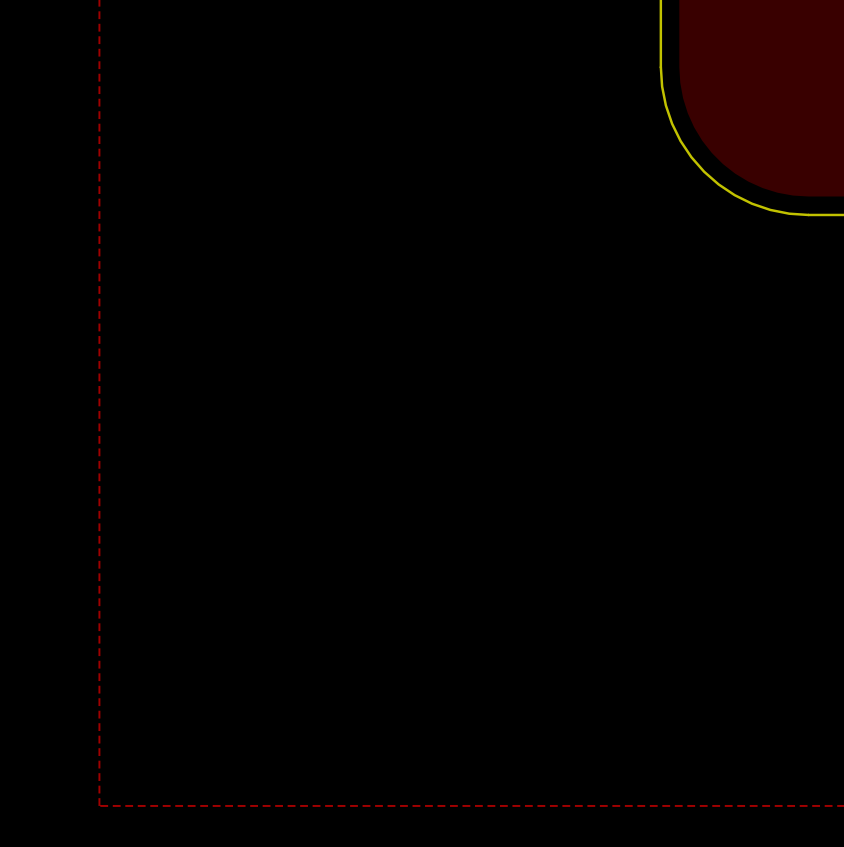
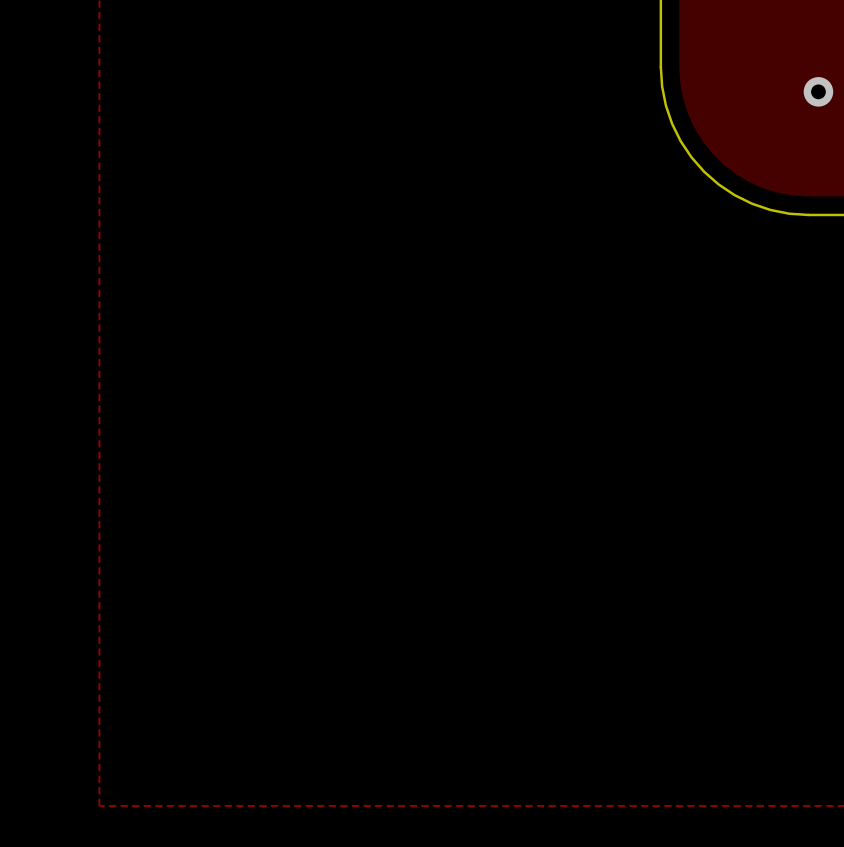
via: none -> (818, 91)

